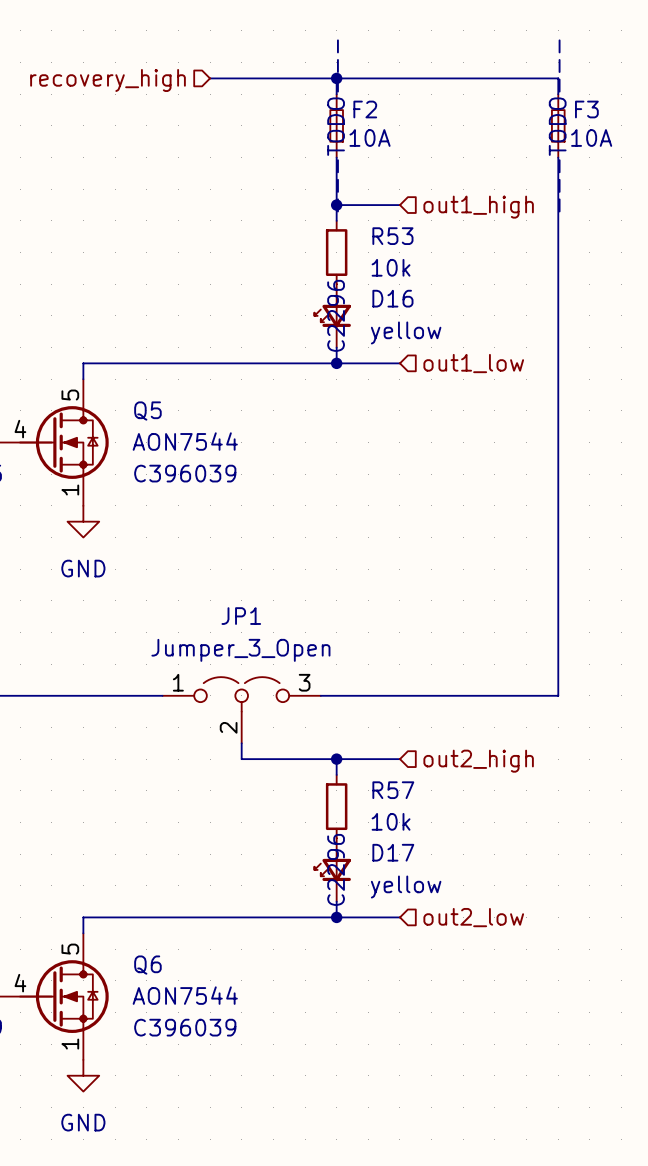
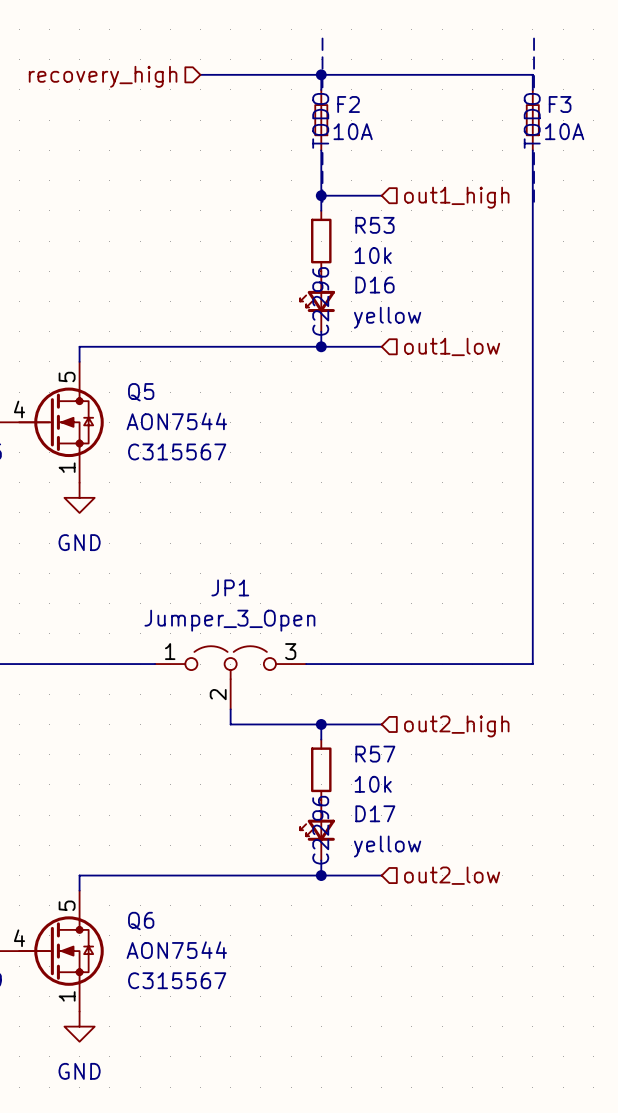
Q5 text: C396039 (185, 473) -> C315567 (177, 451)
Q6 text: C396039 (185, 1027) -> C315567 (177, 980)

